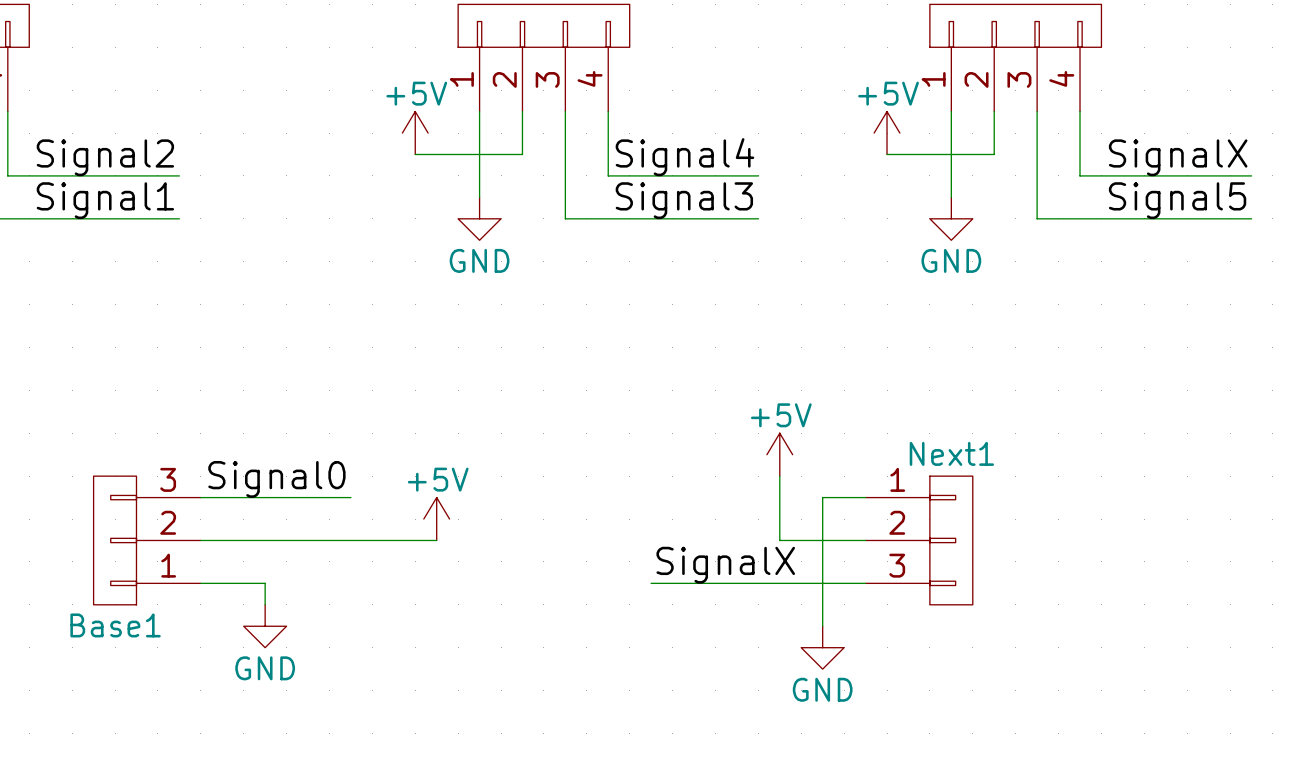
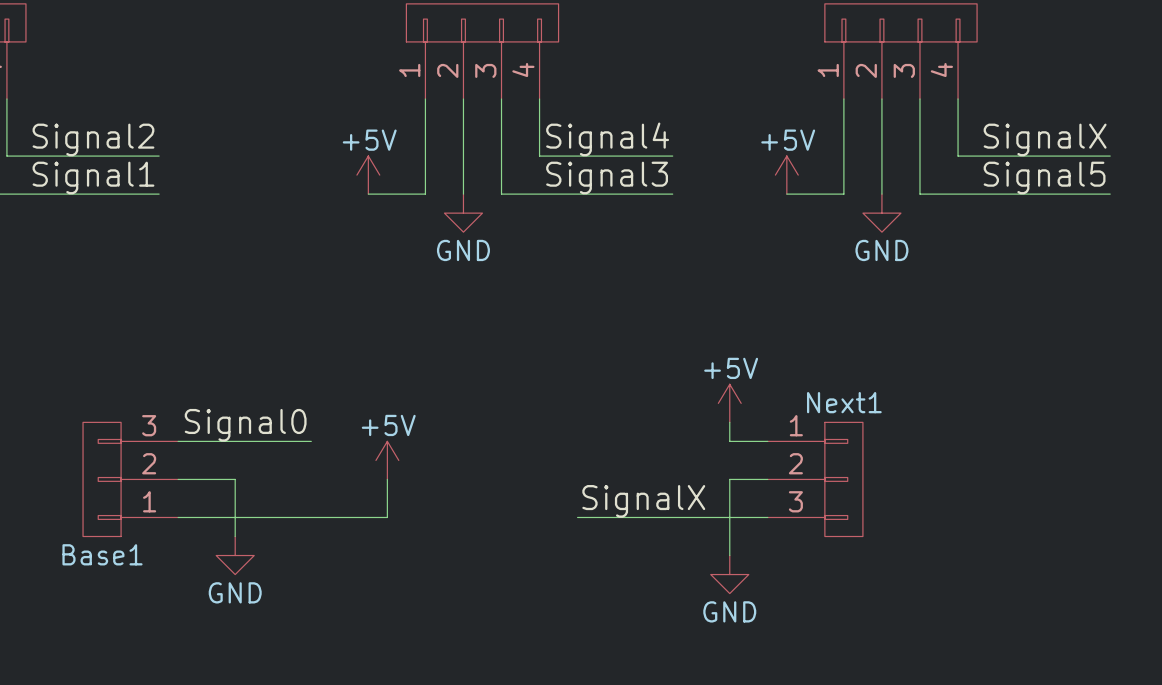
power symbol position: +5V (415, 133) -> +5V (368, 175)
power symbol position: +5V (887, 133) -> +5V (786, 175)
wire: (415, 154) (522, 154) -> (463, 194) (463, 137)
wire: (887, 154) (994, 154) -> (881, 194) (881, 137)
wire: none -> (425, 175) (425, 194) (368, 194)
wire: none -> (843, 175) (843, 194) (786, 194)
power symbol position: GND (479, 218) -> GND (463, 213)
power symbol position: GND (951, 218) -> GND (881, 213)
power symbol position: +5V (779, 454) -> +5V (729, 403)
wire: (779, 476) (779, 540) (822, 540) (822, 497) -> (729, 422) (729, 441)
wire: (265, 540) (436, 540) -> (235, 479) (235, 517) (387, 517) (387, 479)

